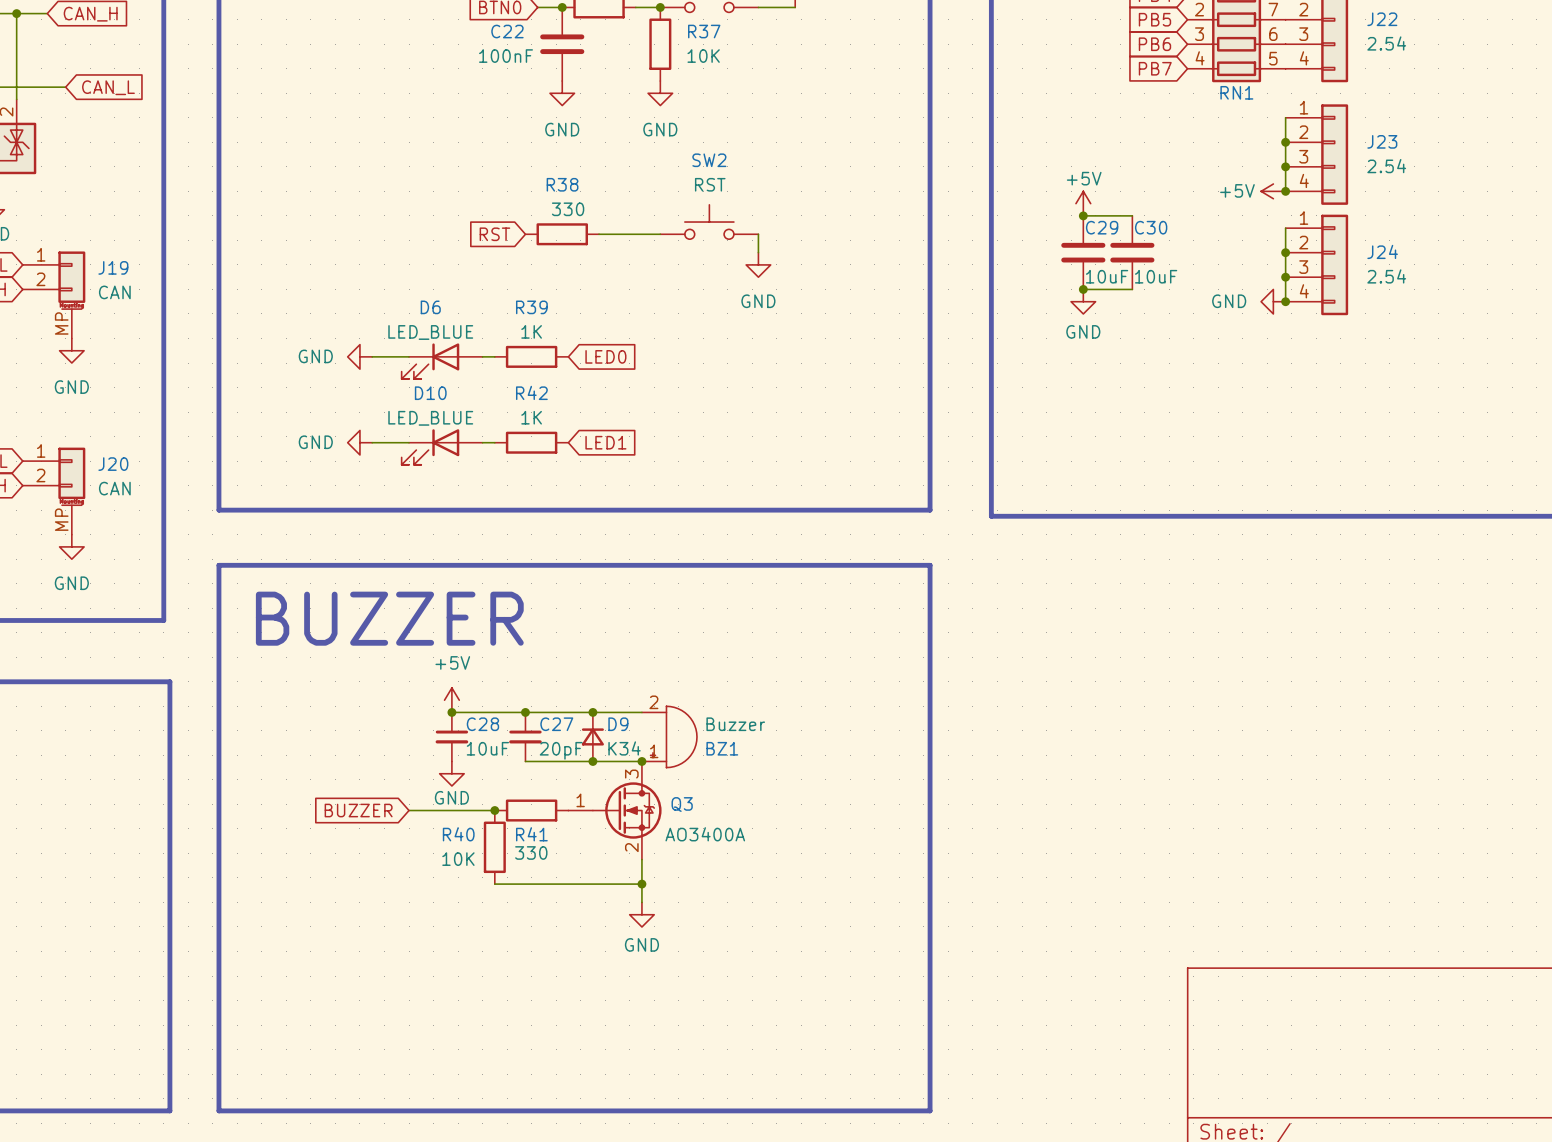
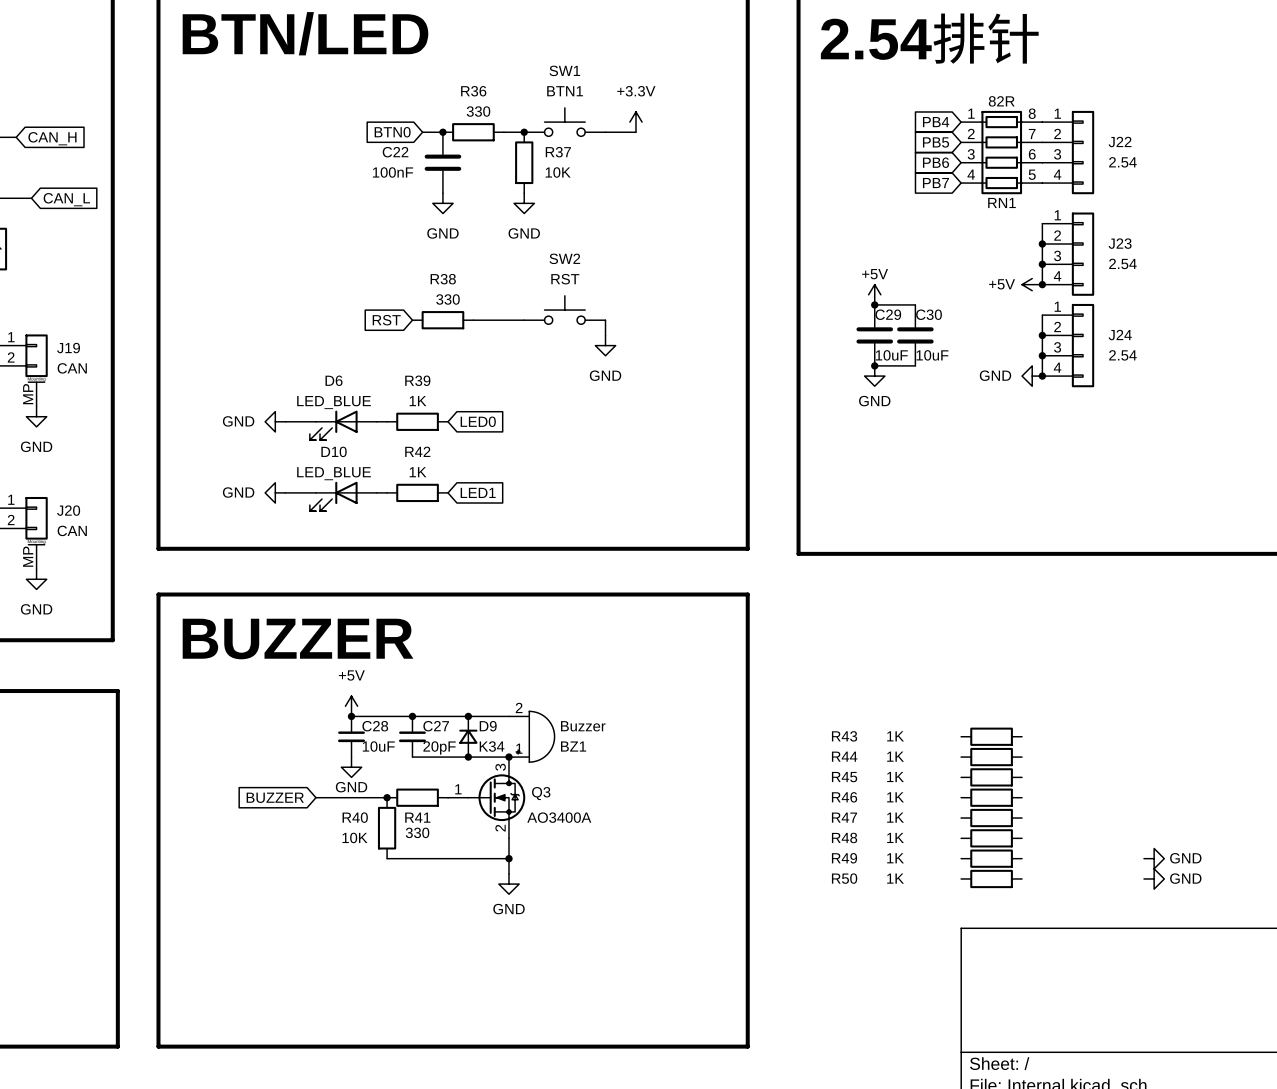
R43: none -> 1K (991, 736)
R44: none -> 1K (991, 757)
R45: none -> 1K (991, 777)
R46: none -> 1K (991, 797)
R47: none -> 1K (991, 818)
R48: none -> 1K (991, 838)
R49: none -> 1K (991, 858)
power symbol: none -> GND (1154, 858)
R50: none -> 1K (991, 878)
power symbol: none -> GND (1154, 878)

